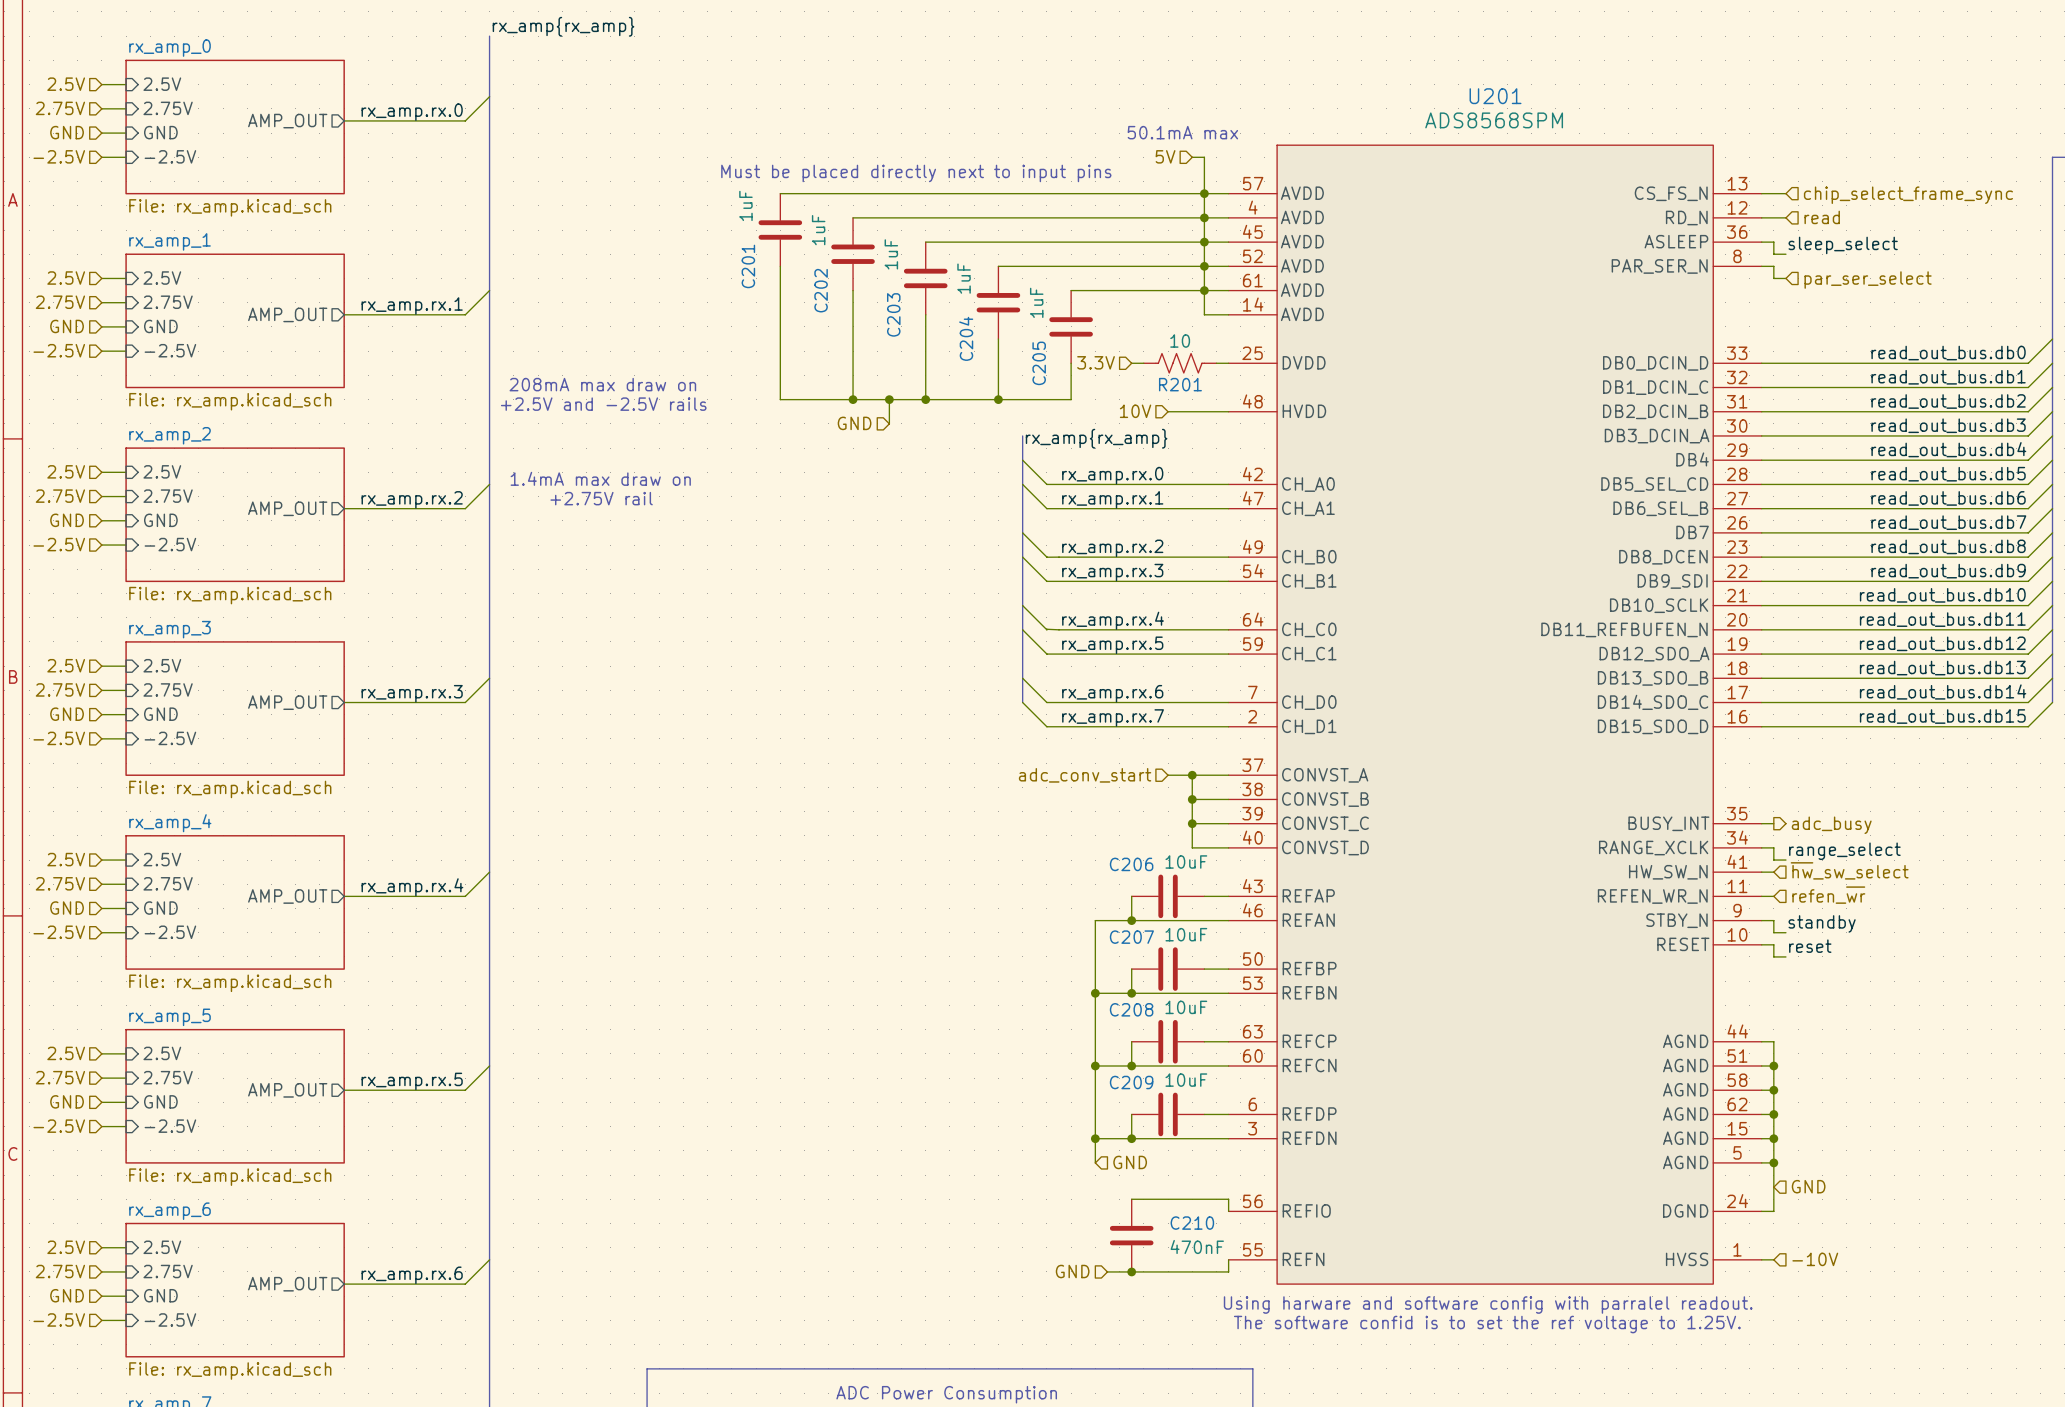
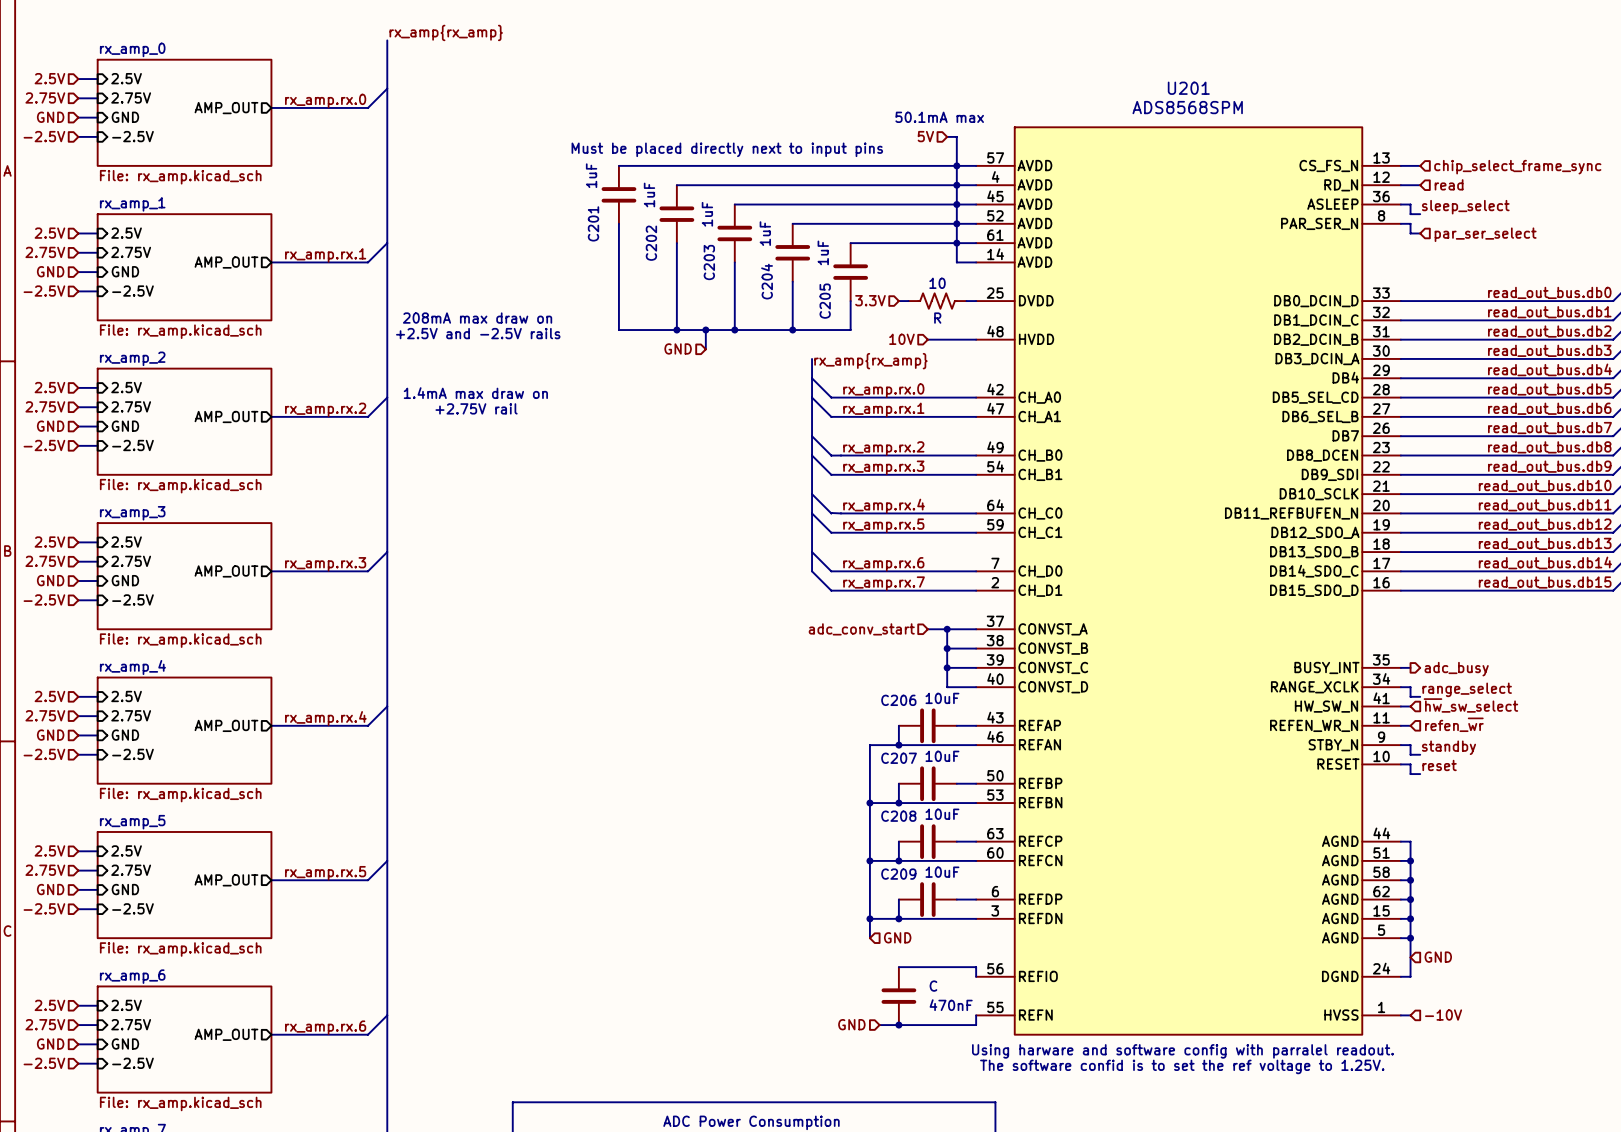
R201 name: R201 (1180, 384) -> R (937, 318)
C210 name: C210 (1192, 1223) -> C (933, 986)

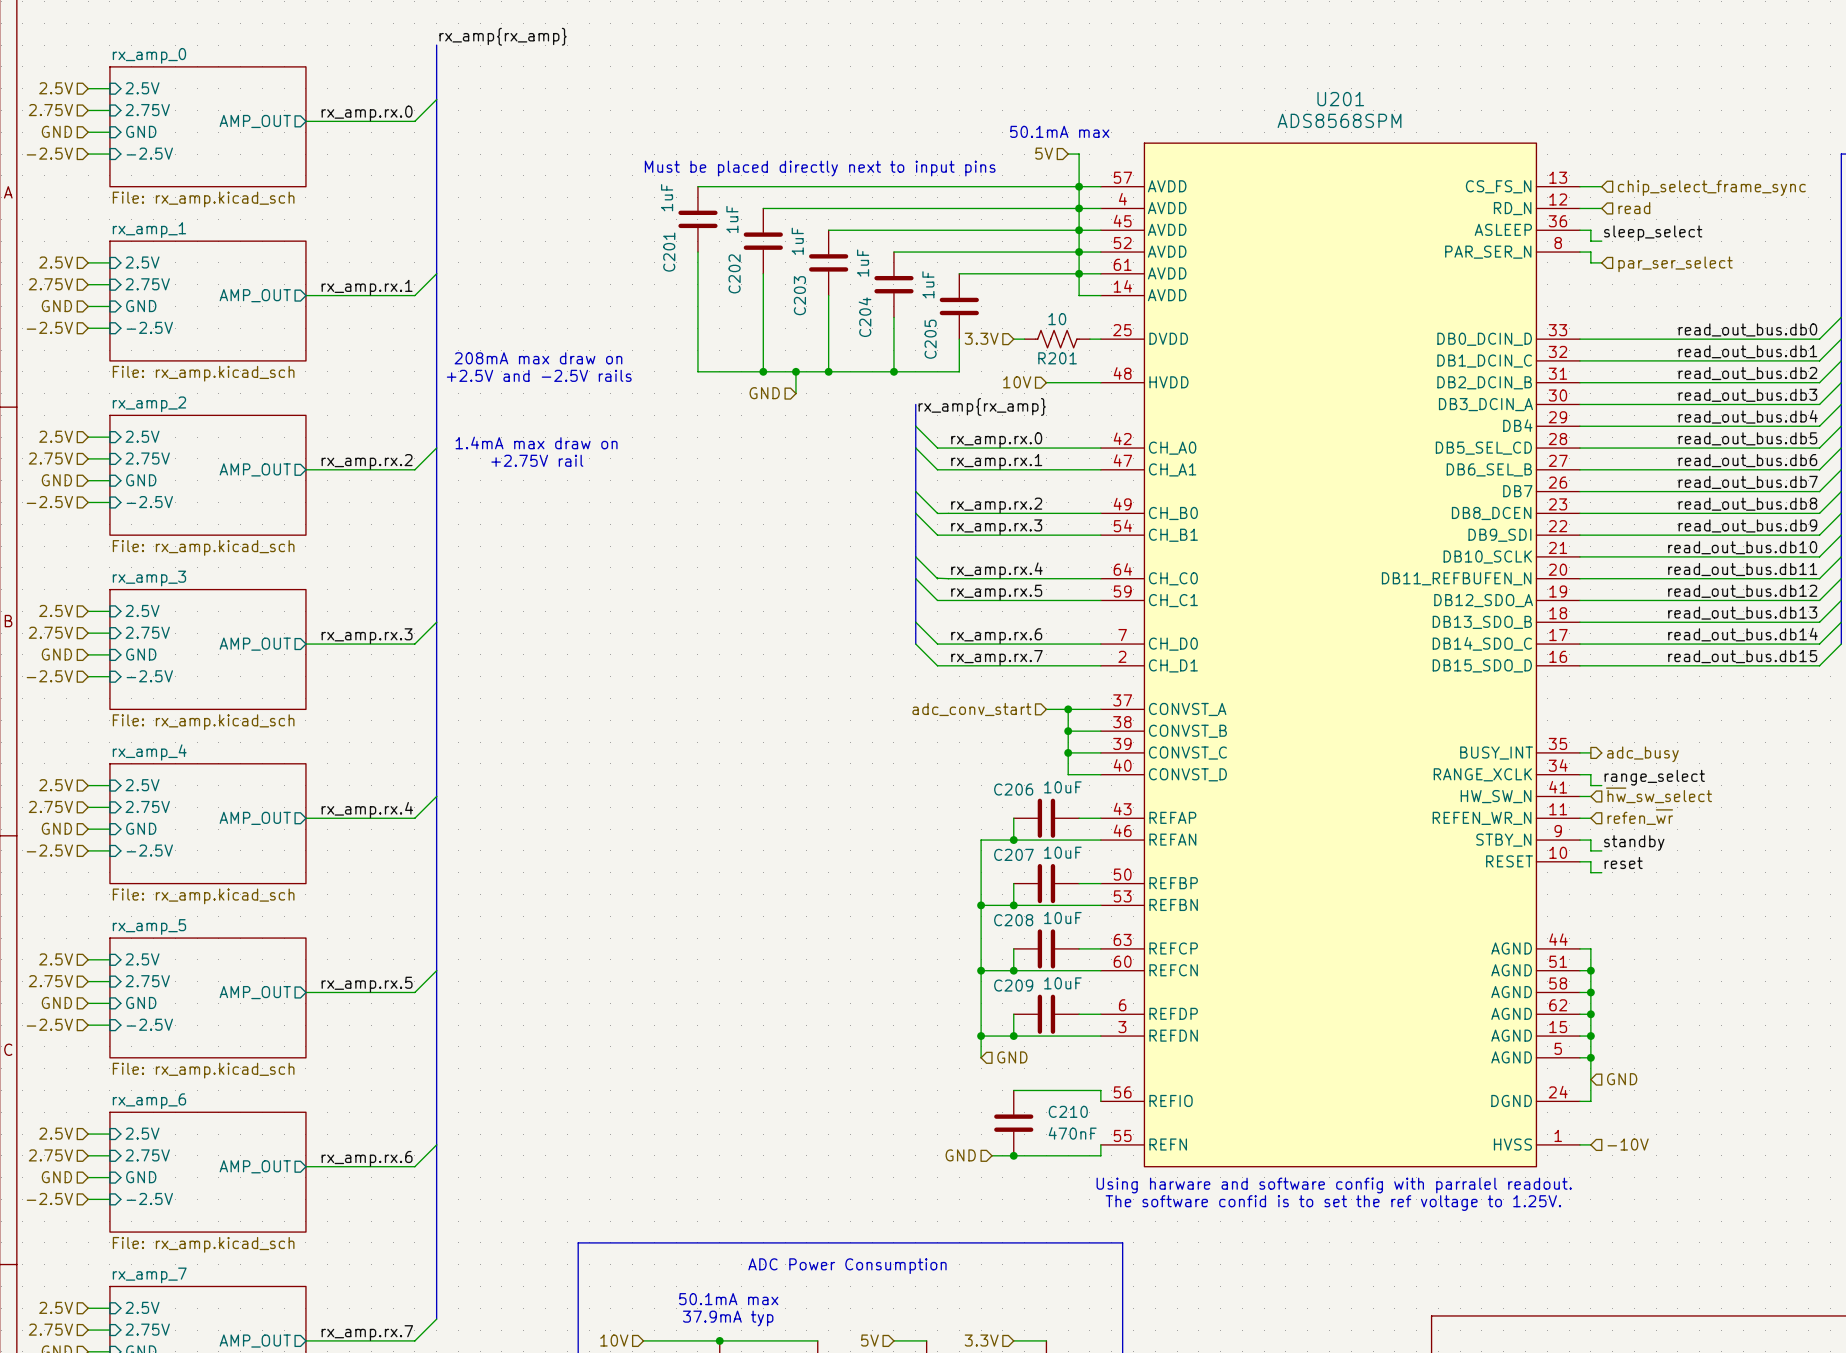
R name: R (937, 318) -> R201 (1057, 358)
C name: C (933, 986) -> C210 (1068, 1111)

